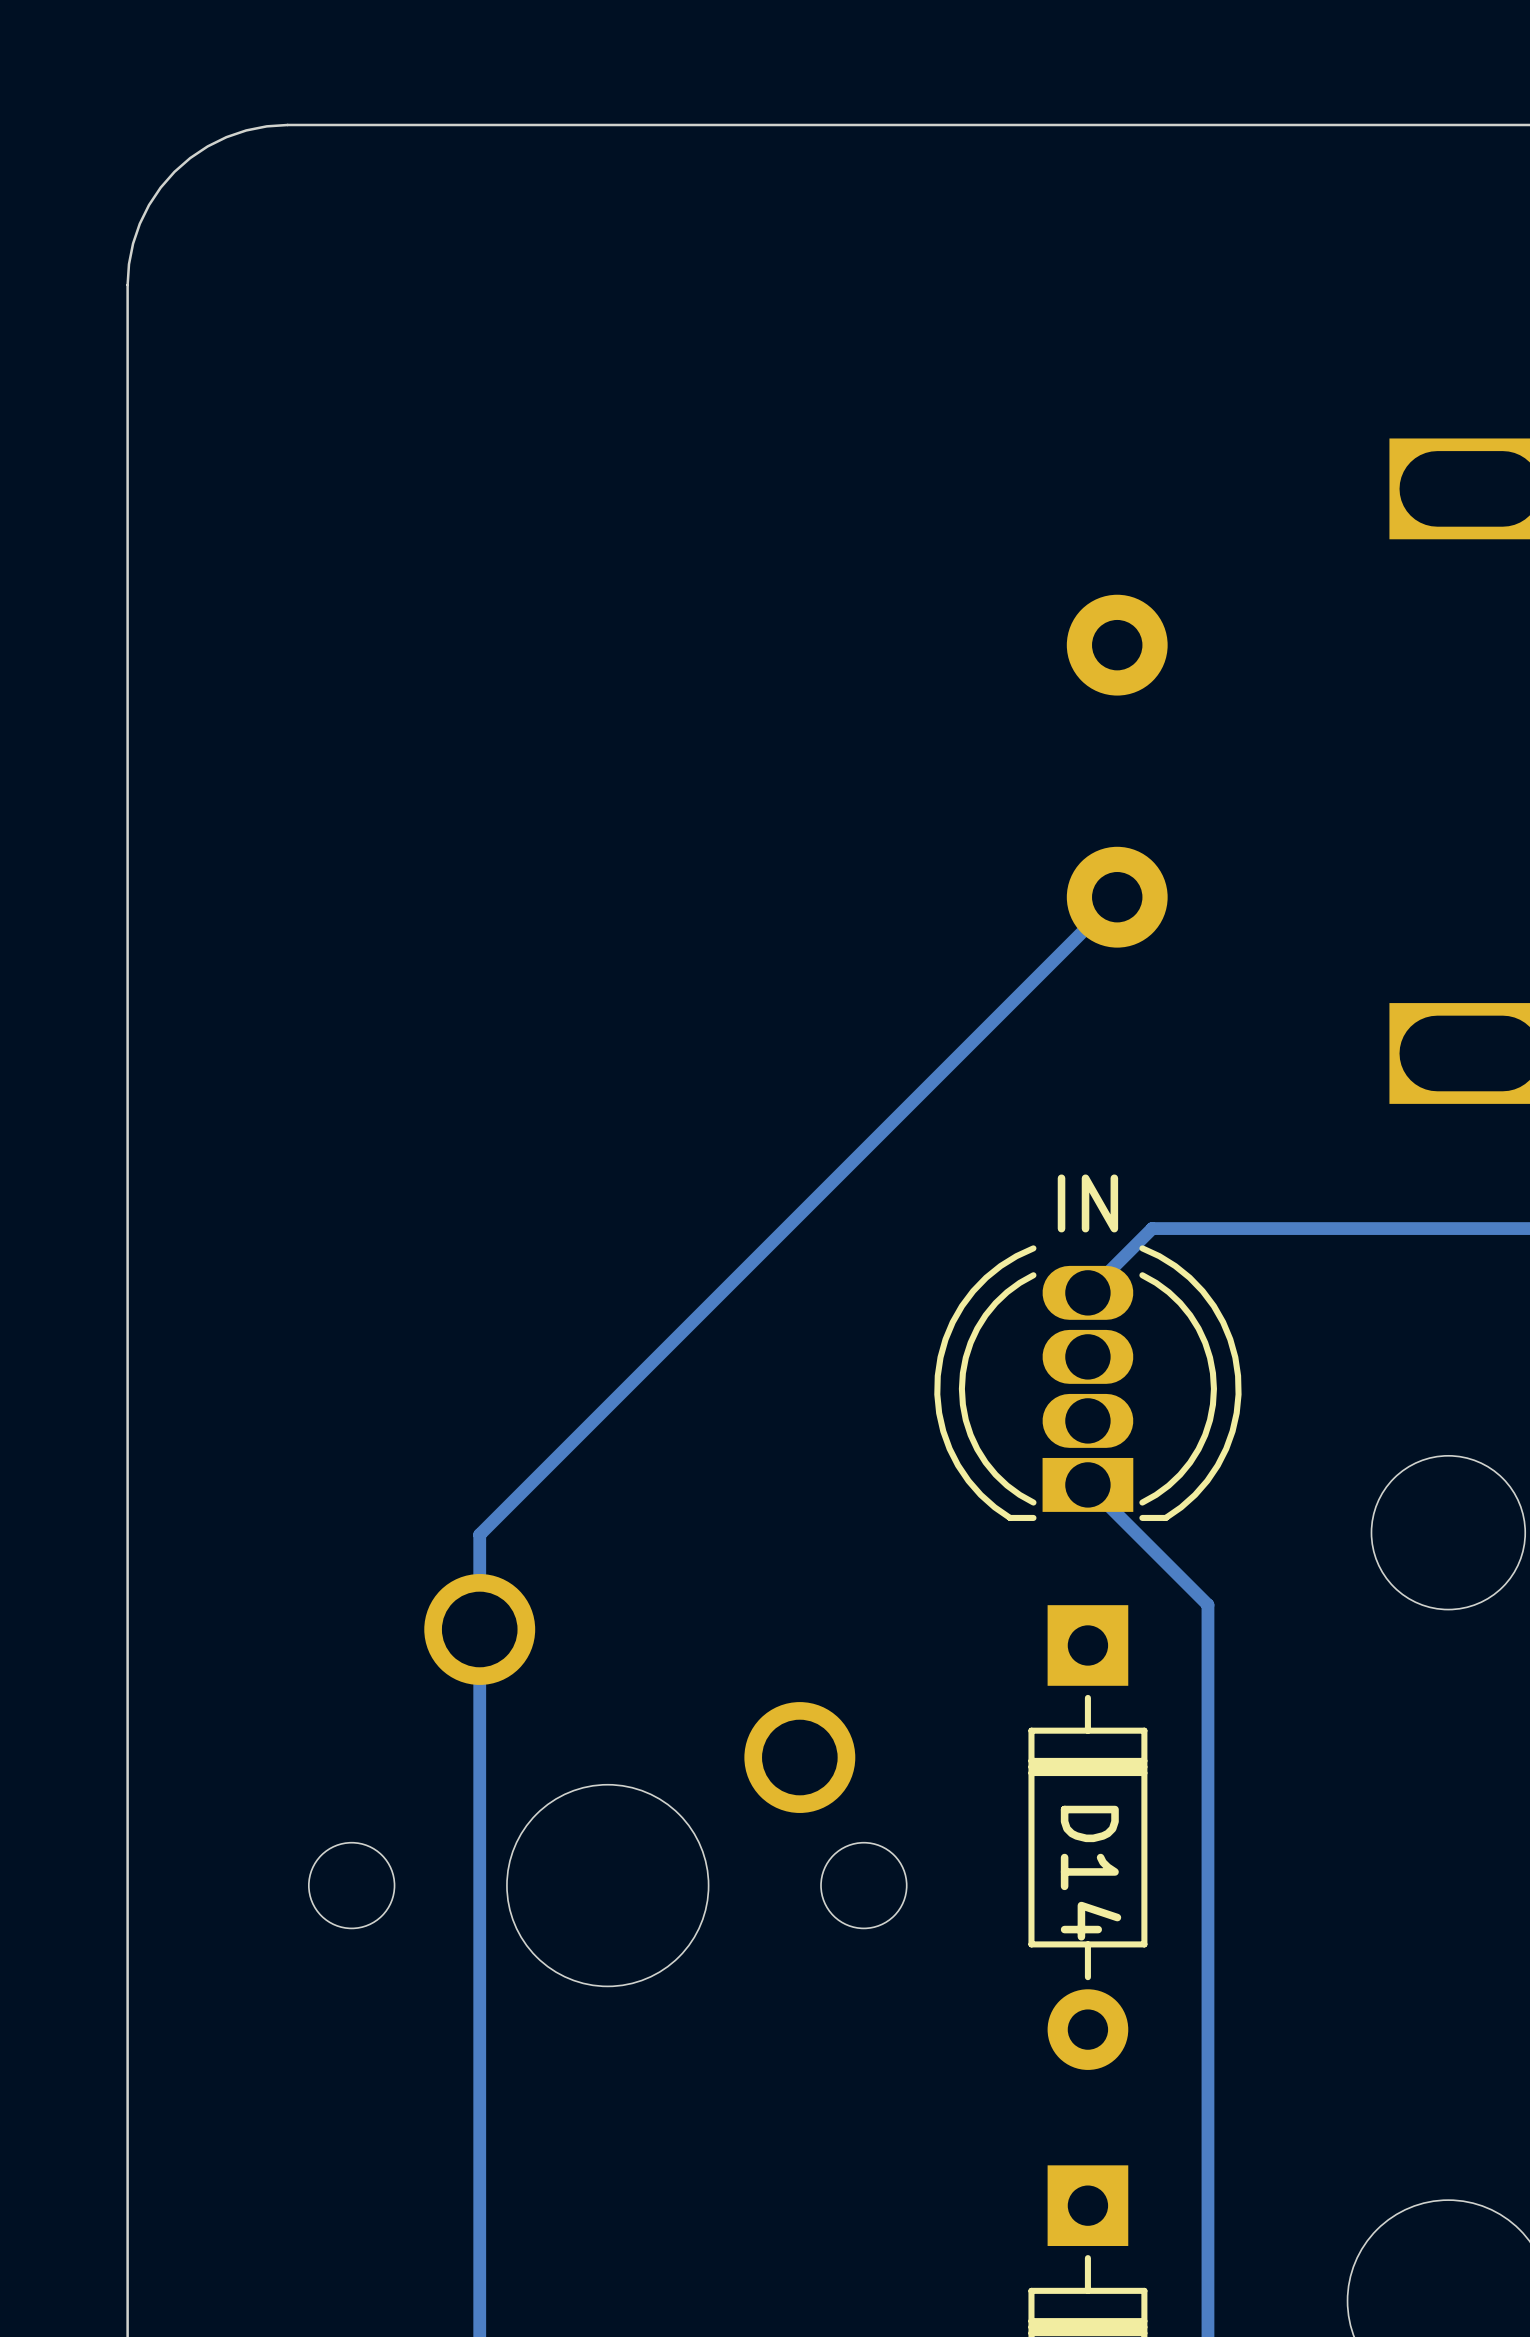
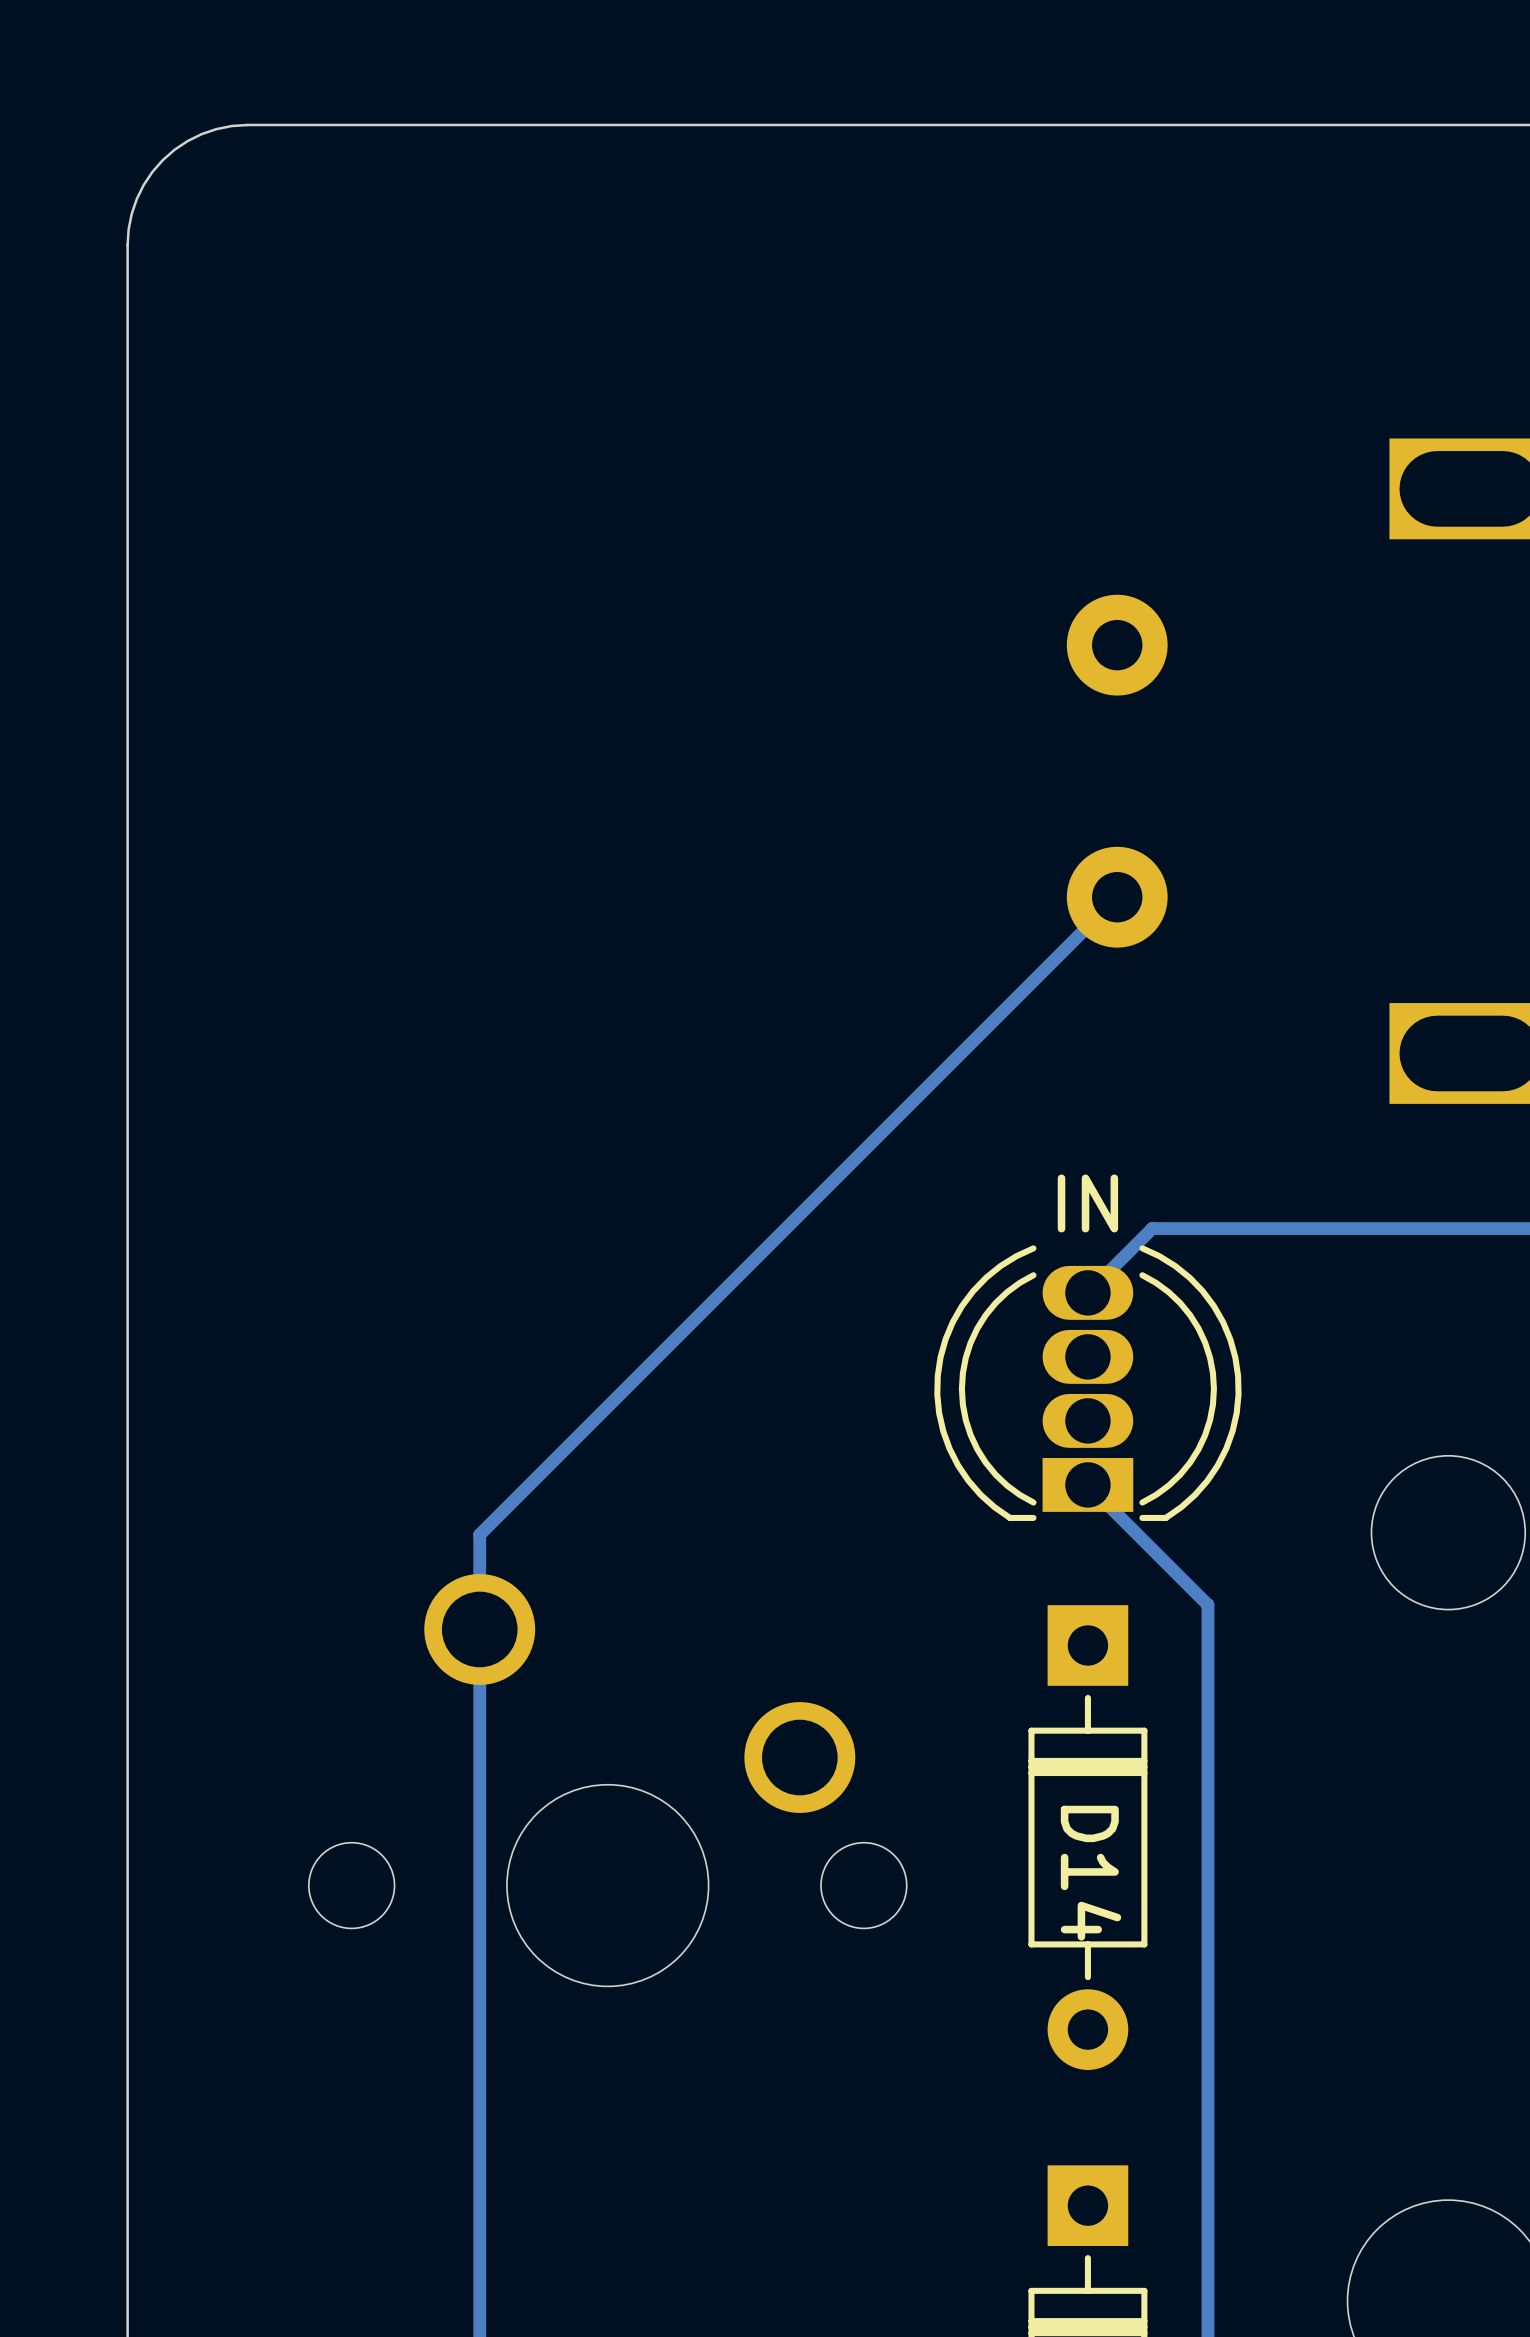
board edge: (287, 124) (266, 126) (226, 137) (190, 158) (174, 171) (149, 205) (139, 223) (133, 243) (127, 285) -> (287, 124) (247, 124) (216, 129) (187, 141) (162, 160) (143, 185) (131, 213) (127, 245) (127, 285)

